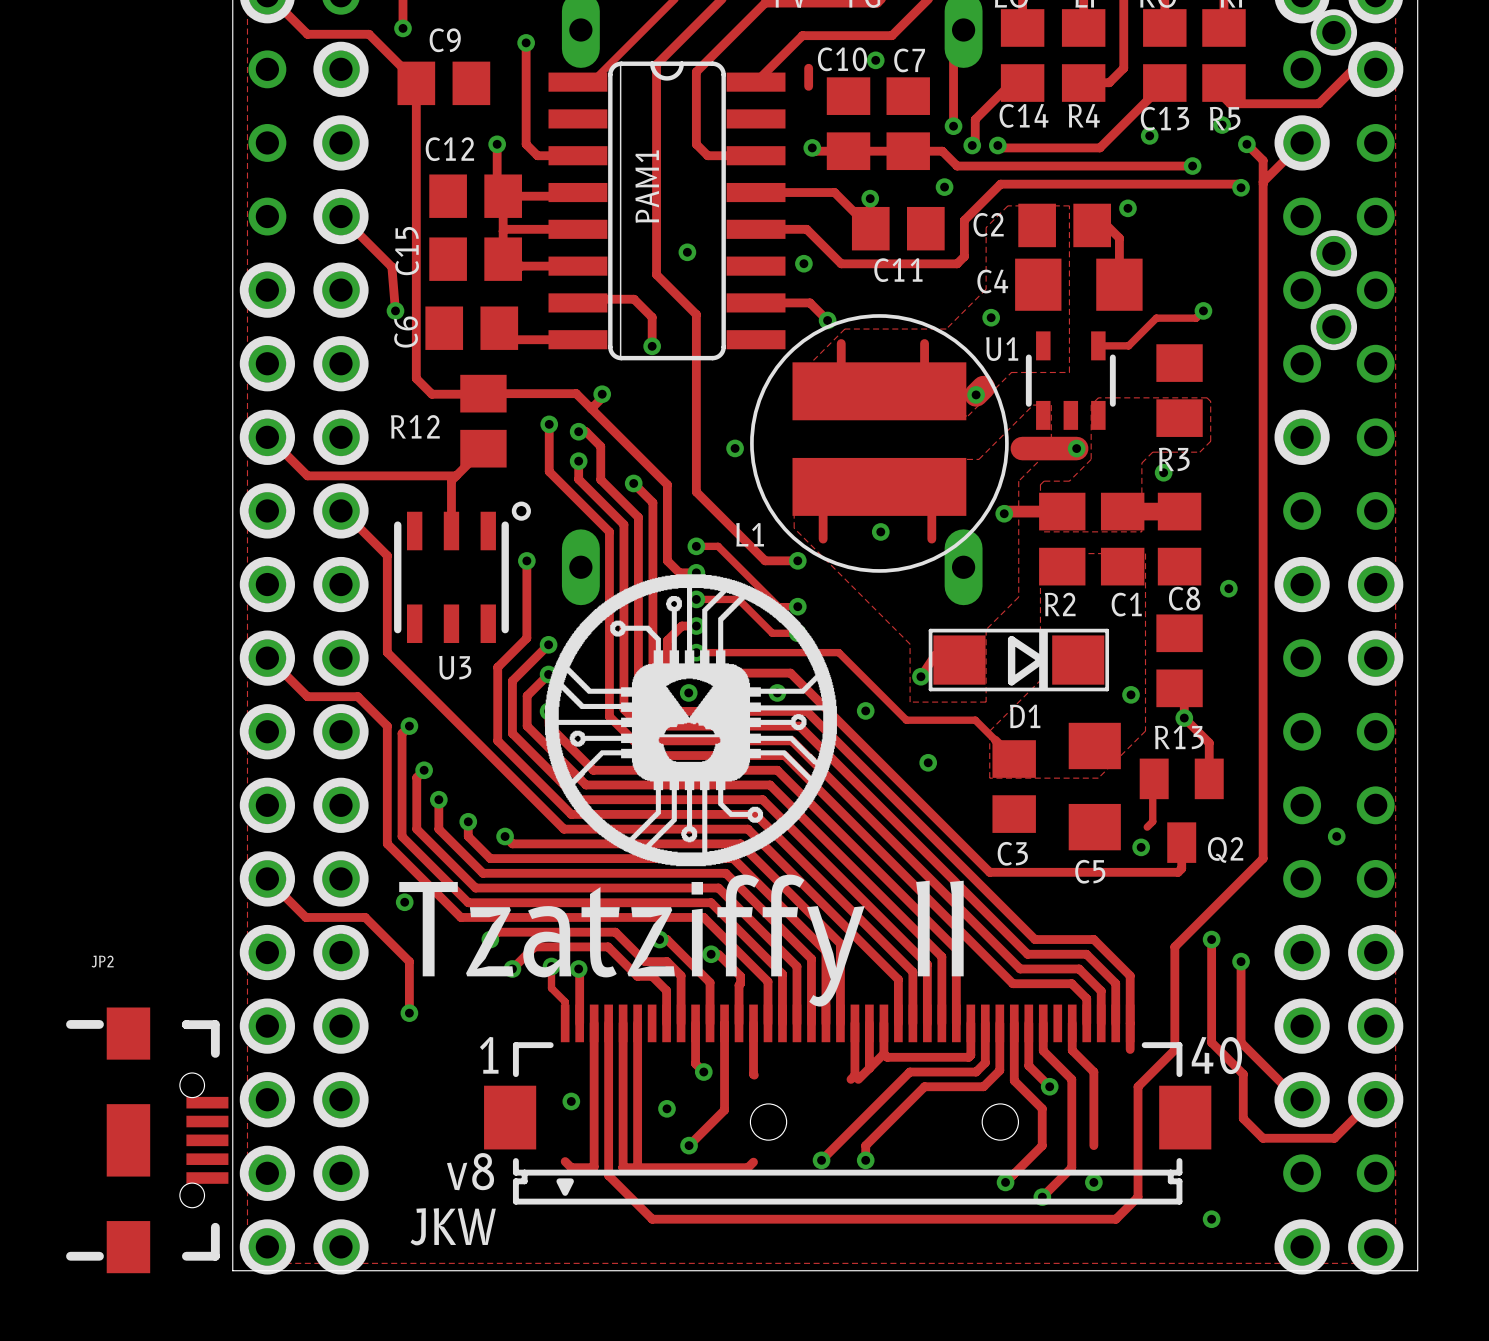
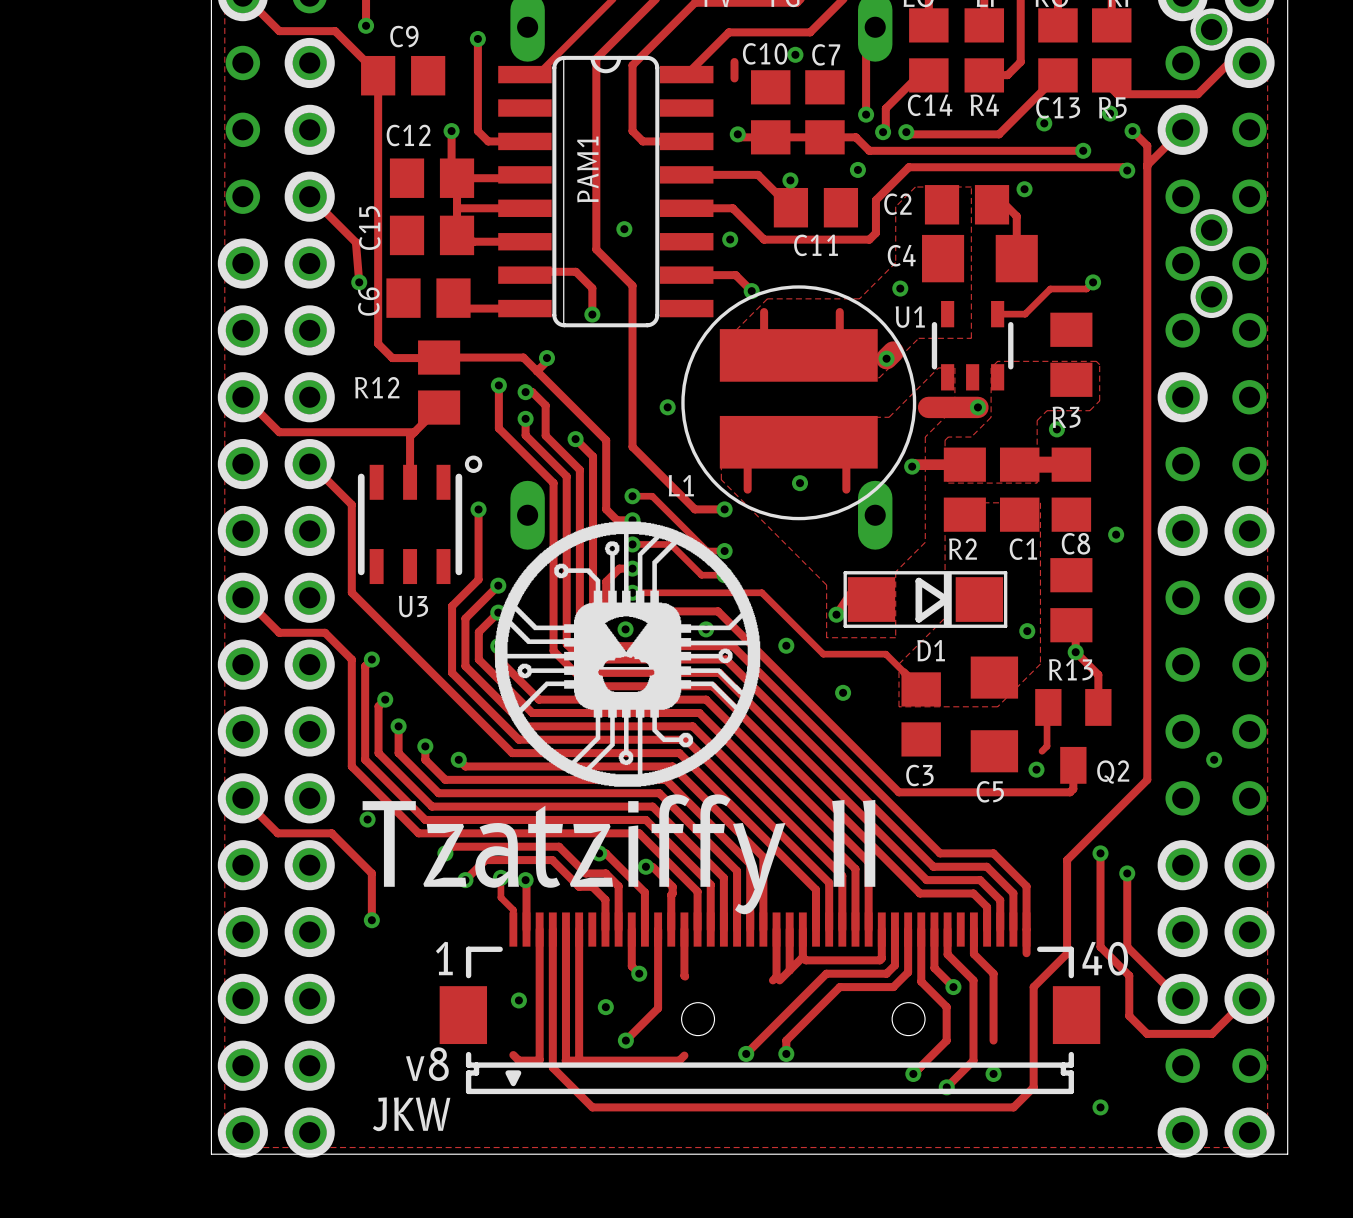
JP2: (147, 1140) -> none

